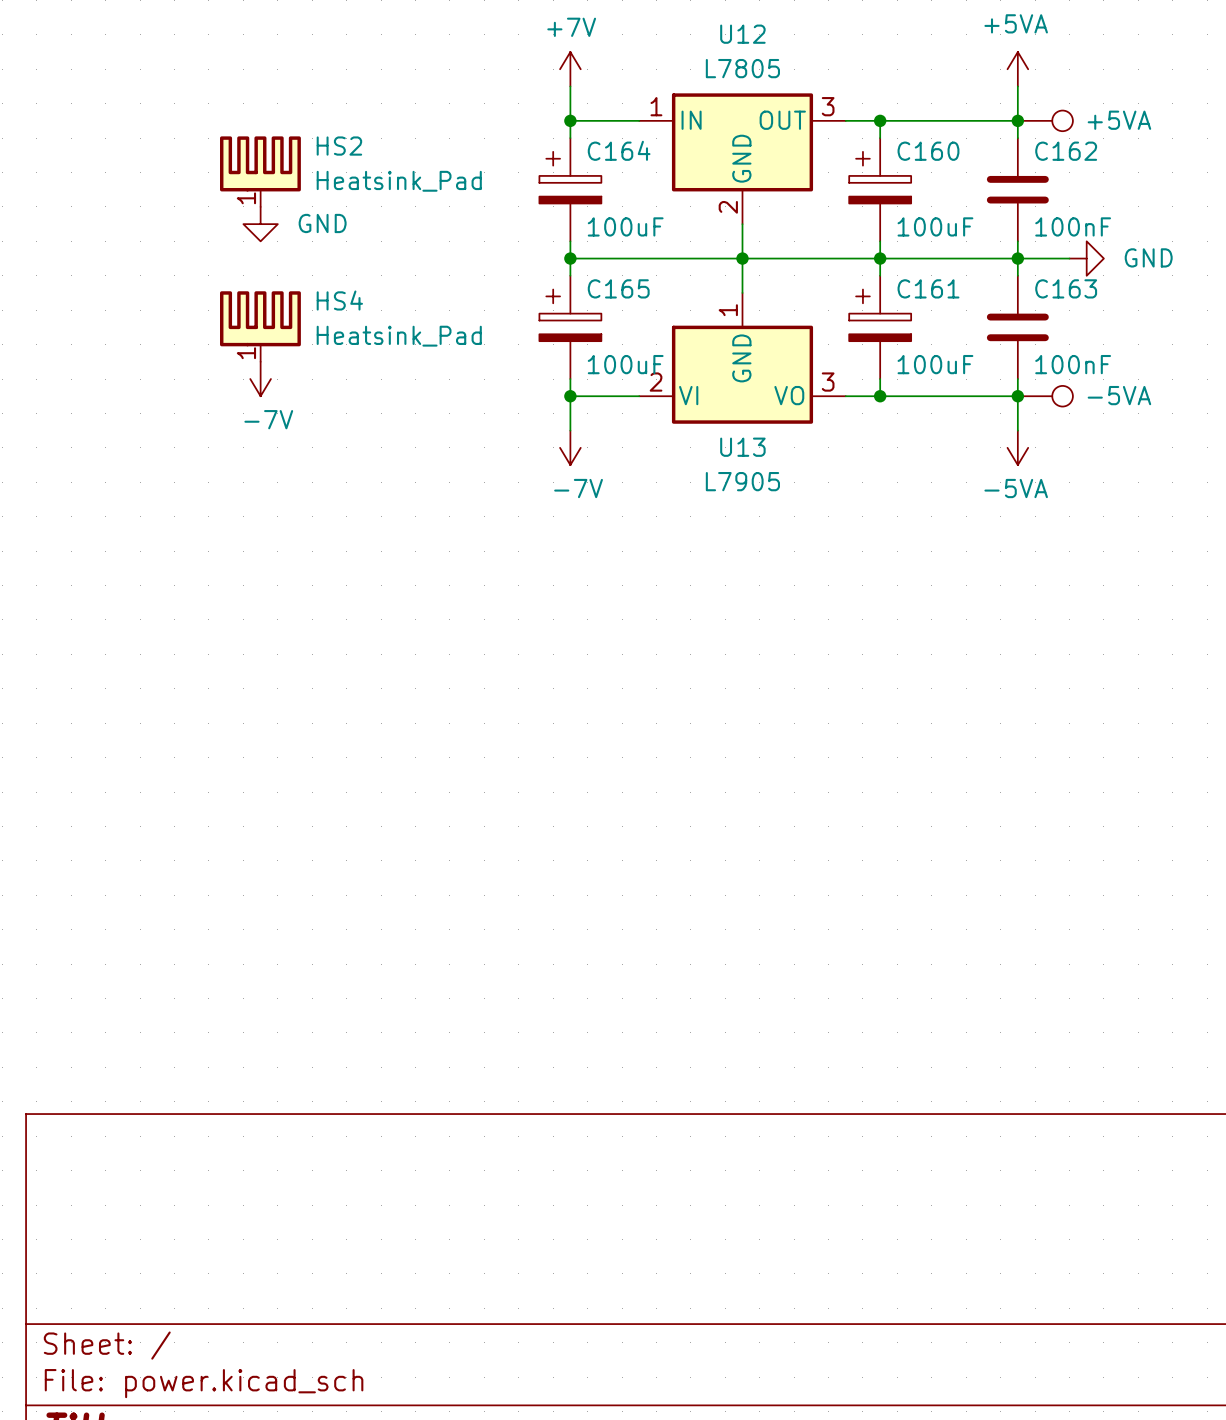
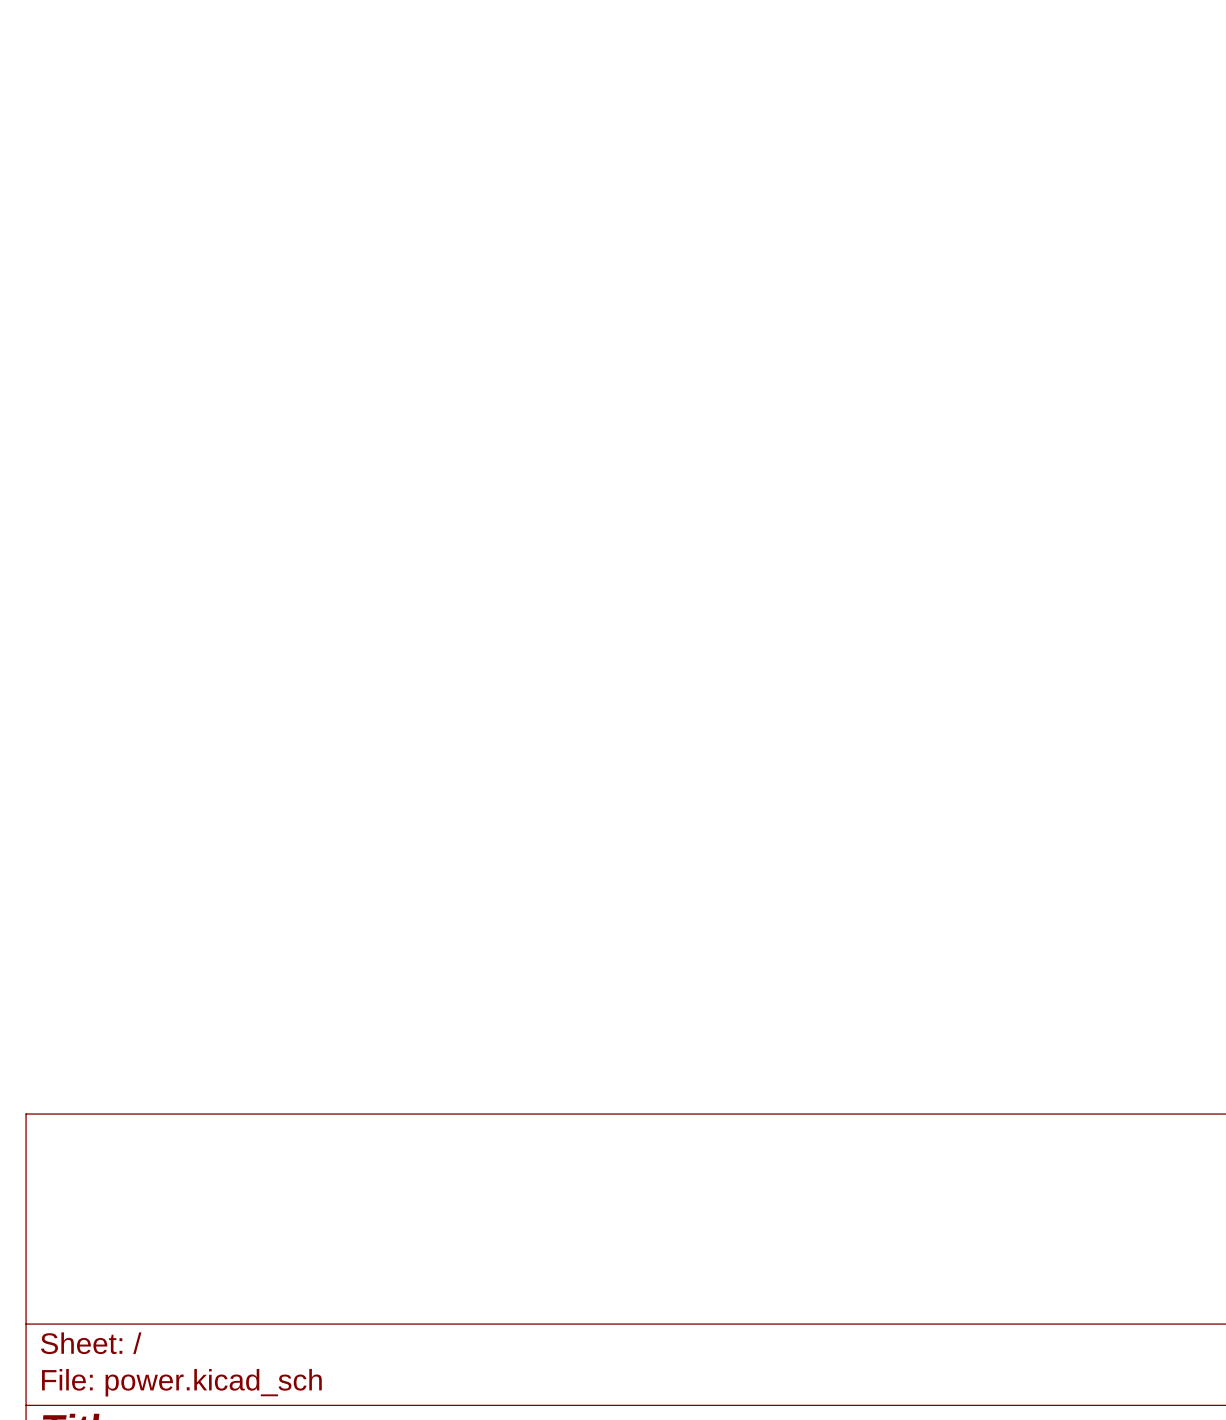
power symbol: +7V (570, 69) -> none
power symbol: +5VA (1017, 69) -> none
wire: (570, 86) (570, 138) -> none
wire: (1017, 86) (1017, 138) -> none
wire: (570, 120) (639, 120) -> none
junction: (570, 120) -> none
wire: (845, 120) (1017, 120) -> none
wire: (880, 120) (880, 138) -> none
junction: (880, 120) -> none
junction: (1017, 120) -> none
part: +5VA (1045, 120) -> none
U12: L7805 (742, 158) -> none
HS2: Heatsink_Pad (260, 171) -> none
C164: 100uF (570, 189) -> none
C160: 100uF (880, 189) -> none
C162: 100nF (1017, 189) -> none
power symbol: GND (260, 224) -> none
wire: (742, 224) (742, 292) -> none
wire: (570, 241) (570, 275) -> none
wire: (880, 241) (880, 275) -> none
wire: (1017, 241) (1017, 275) -> none
wire: (570, 258) (1069, 258) -> none
junction: (570, 258) -> none
junction: (742, 258) -> none
junction: (880, 258) -> none
junction: (1017, 258) -> none
power symbol: GND (1086, 258) -> none
HS4: Heatsink_Pad (260, 326) -> none
C165: 100uF (570, 327) -> none
C161: 100uF (880, 327) -> none
C163: 100nF (1017, 327) -> none
U13: L7905 (742, 358) -> none
power symbol: -7V (260, 379) -> none
wire: (570, 379) (570, 430) -> none
wire: (880, 379) (880, 396) -> none
wire: (1017, 379) (1017, 430) -> none
wire: (570, 396) (639, 396) -> none
junction: (570, 396) -> none
wire: (845, 396) (1017, 396) -> none
junction: (880, 396) -> none
junction: (1017, 396) -> none
part: -5VA (1045, 396) -> none
power symbol: -7V (570, 447) -> none
power symbol: -5VA (1017, 447) -> none

